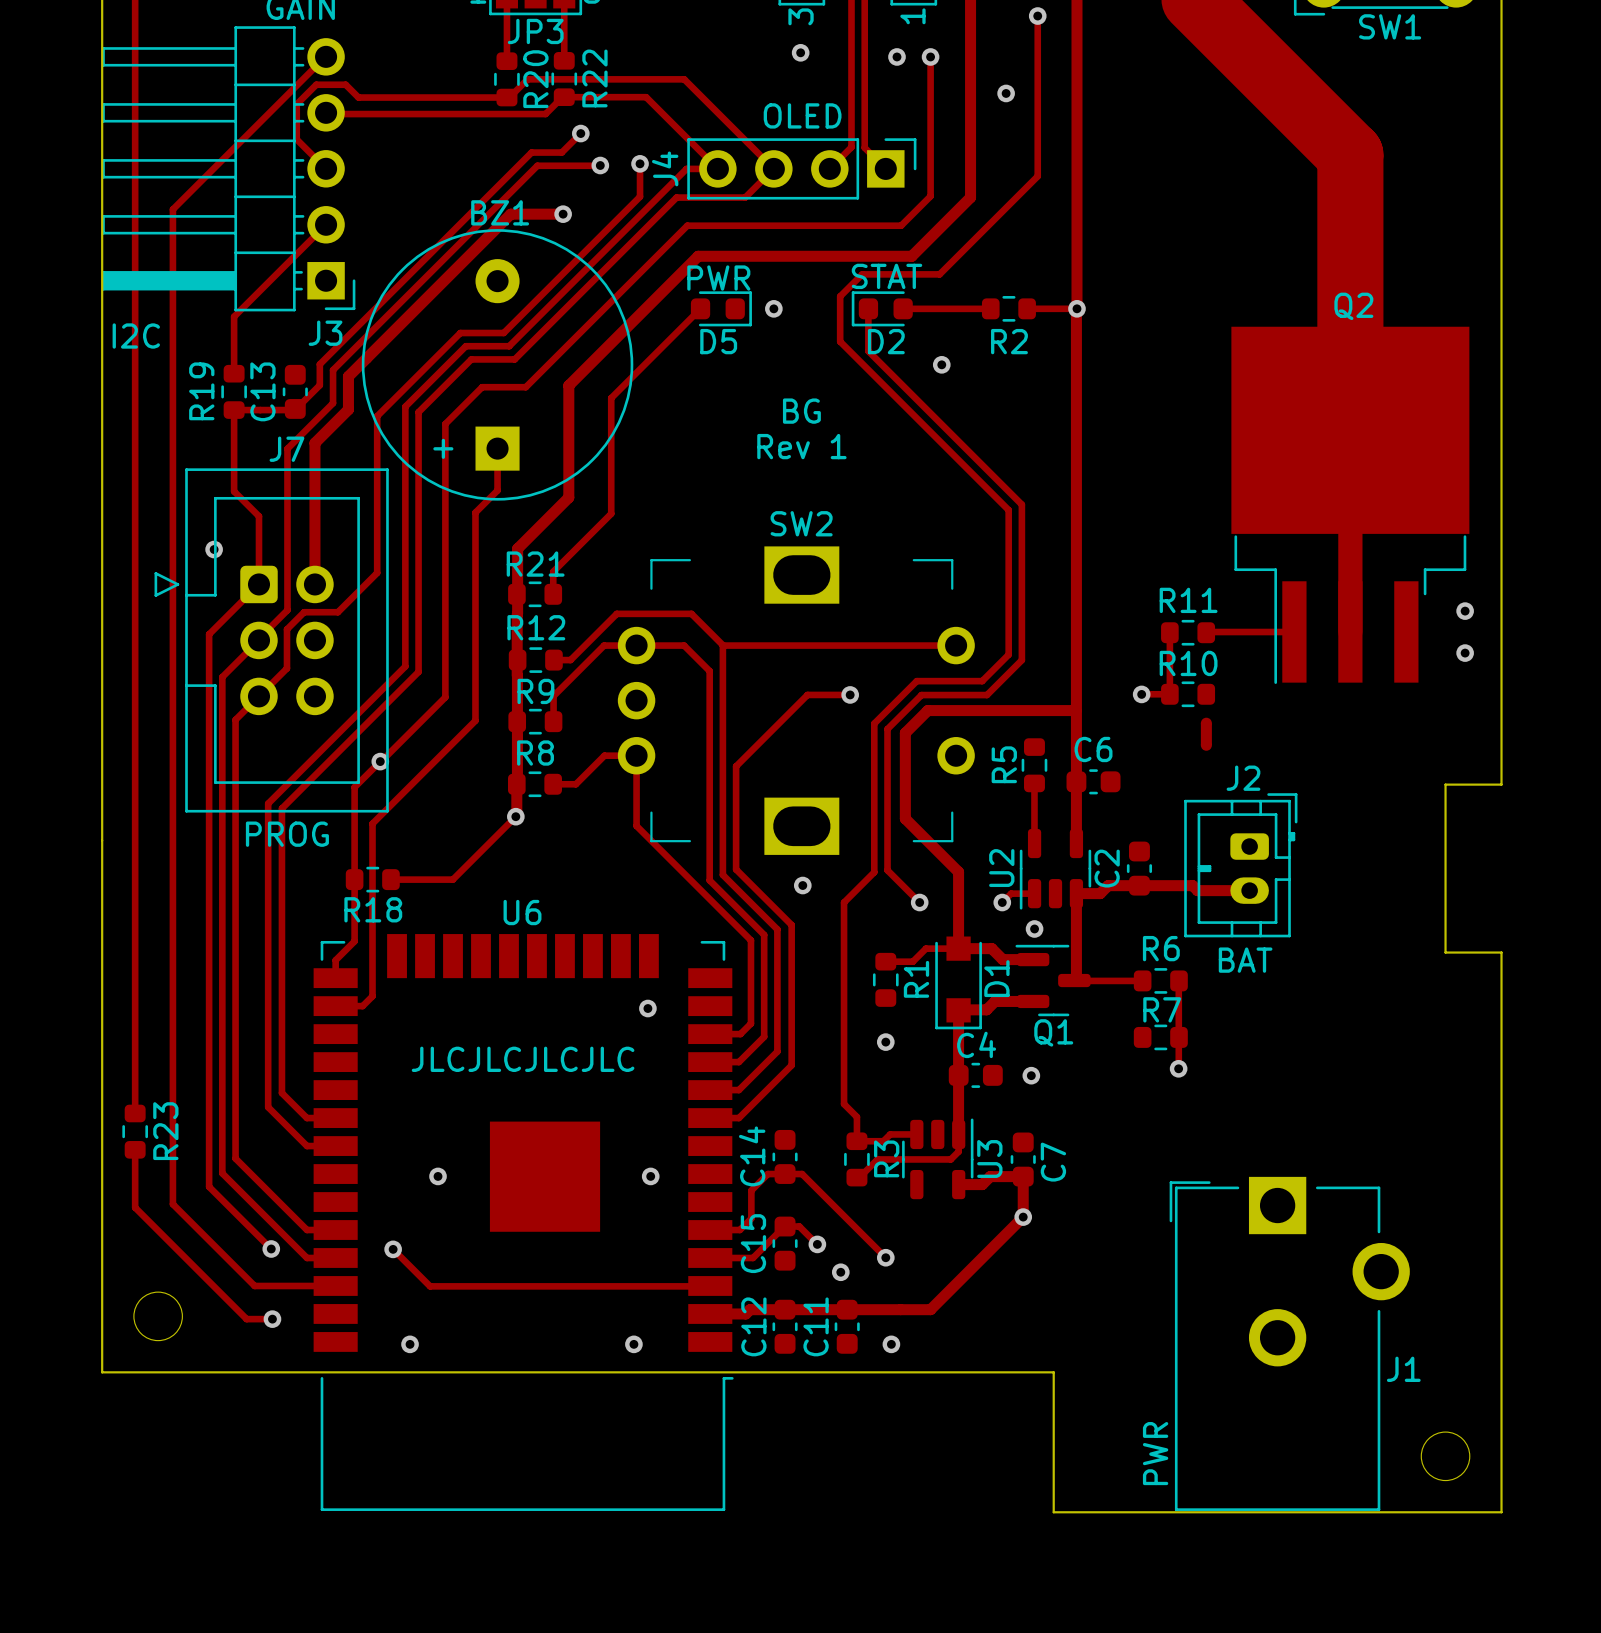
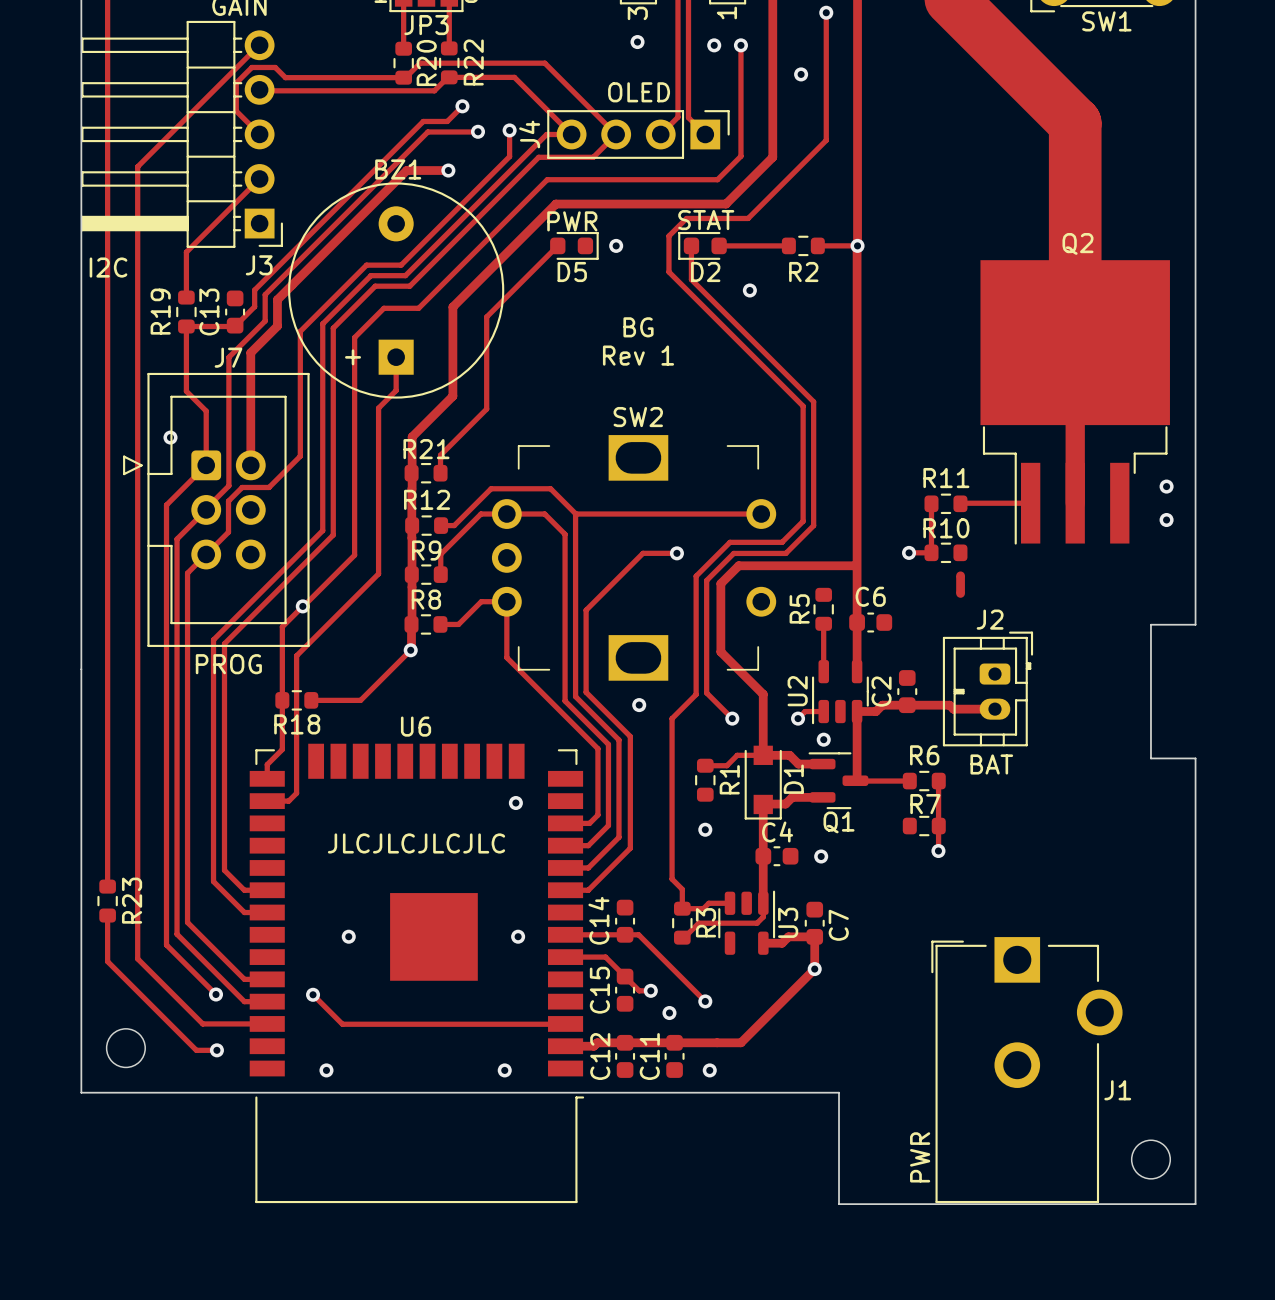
track: (767, 1174) (751, 1190) (751, 1218) (739, 1230) (710, 1230) -> (611, 934) (565, 934)
track: none -> (565, 957) (605, 957) (625, 976)
track: (817, 1244) (799, 1226) (784, 1226) (753, 1258) (710, 1258) -> (650, 990) (639, 990) (625, 976)

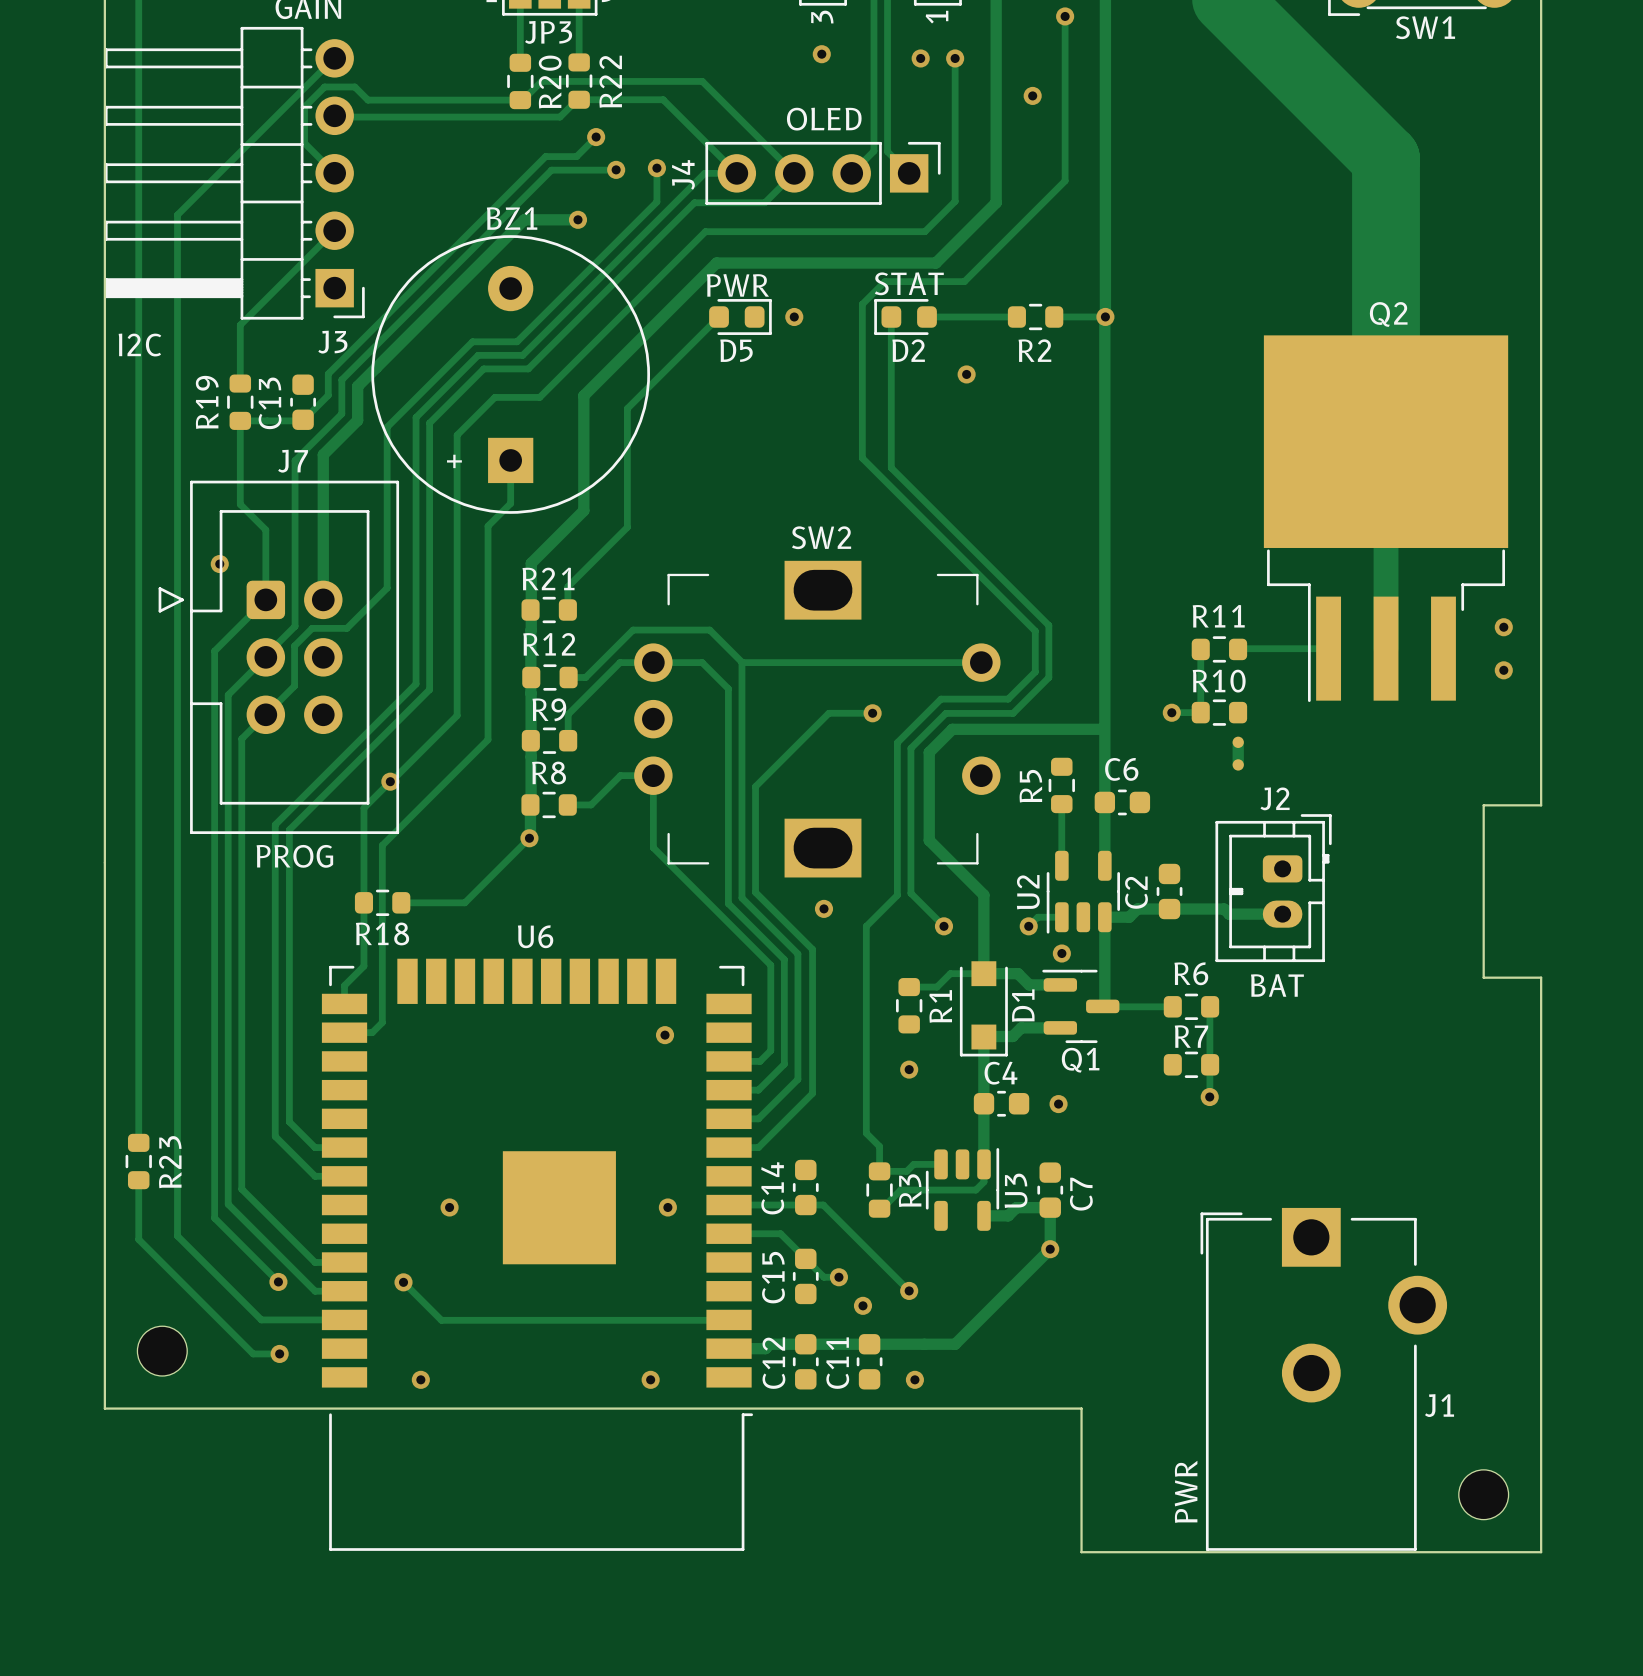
track: (668, 272) (803, 406) (803, 489) -> (862, 350) (862, 458) (1035, 631)
track: (691, 279) (813, 401) (813, 485) -> (891, 360) (891, 467) (1048, 625)
text: BG (638, 327) -> none
text: Rev 1 (638, 355) -> none
text: JLCJLCJLCJLC (416, 843) -> none

